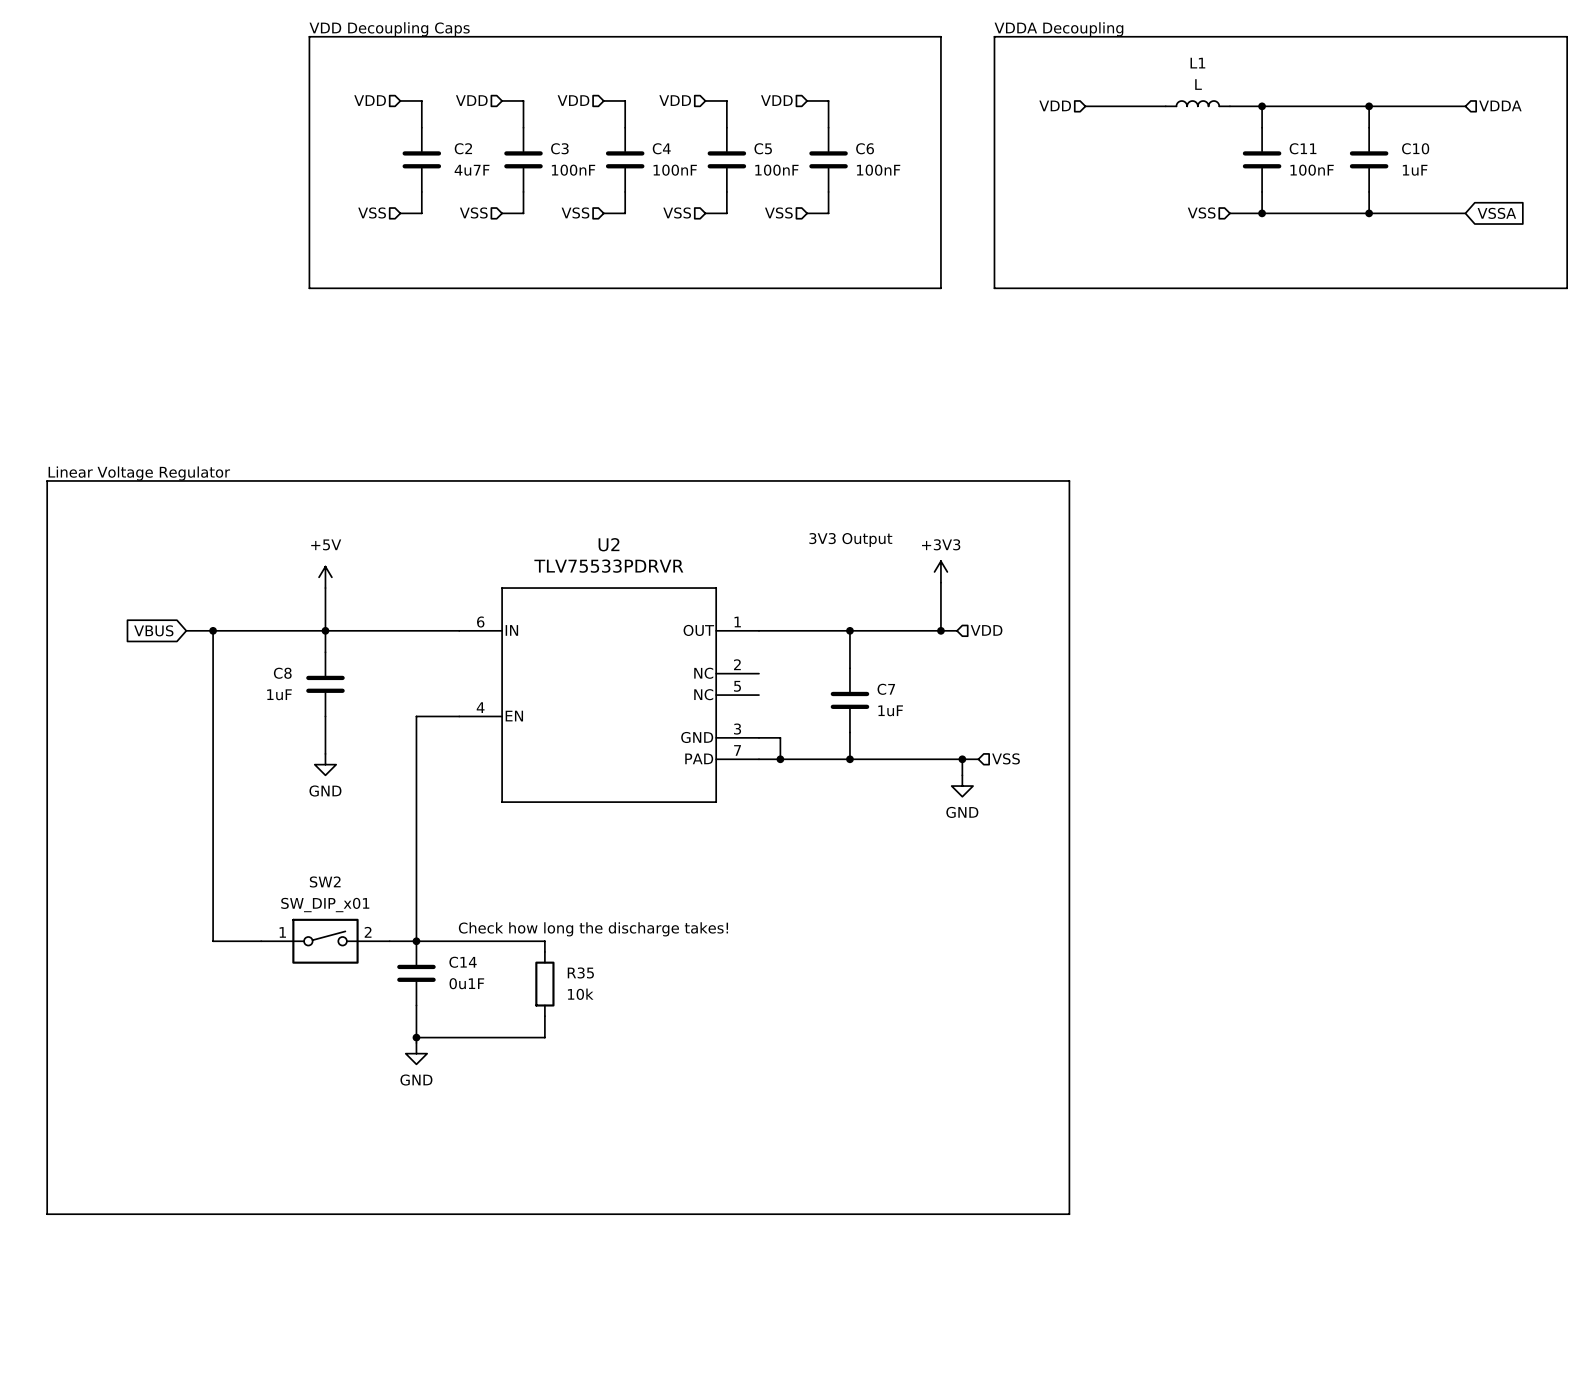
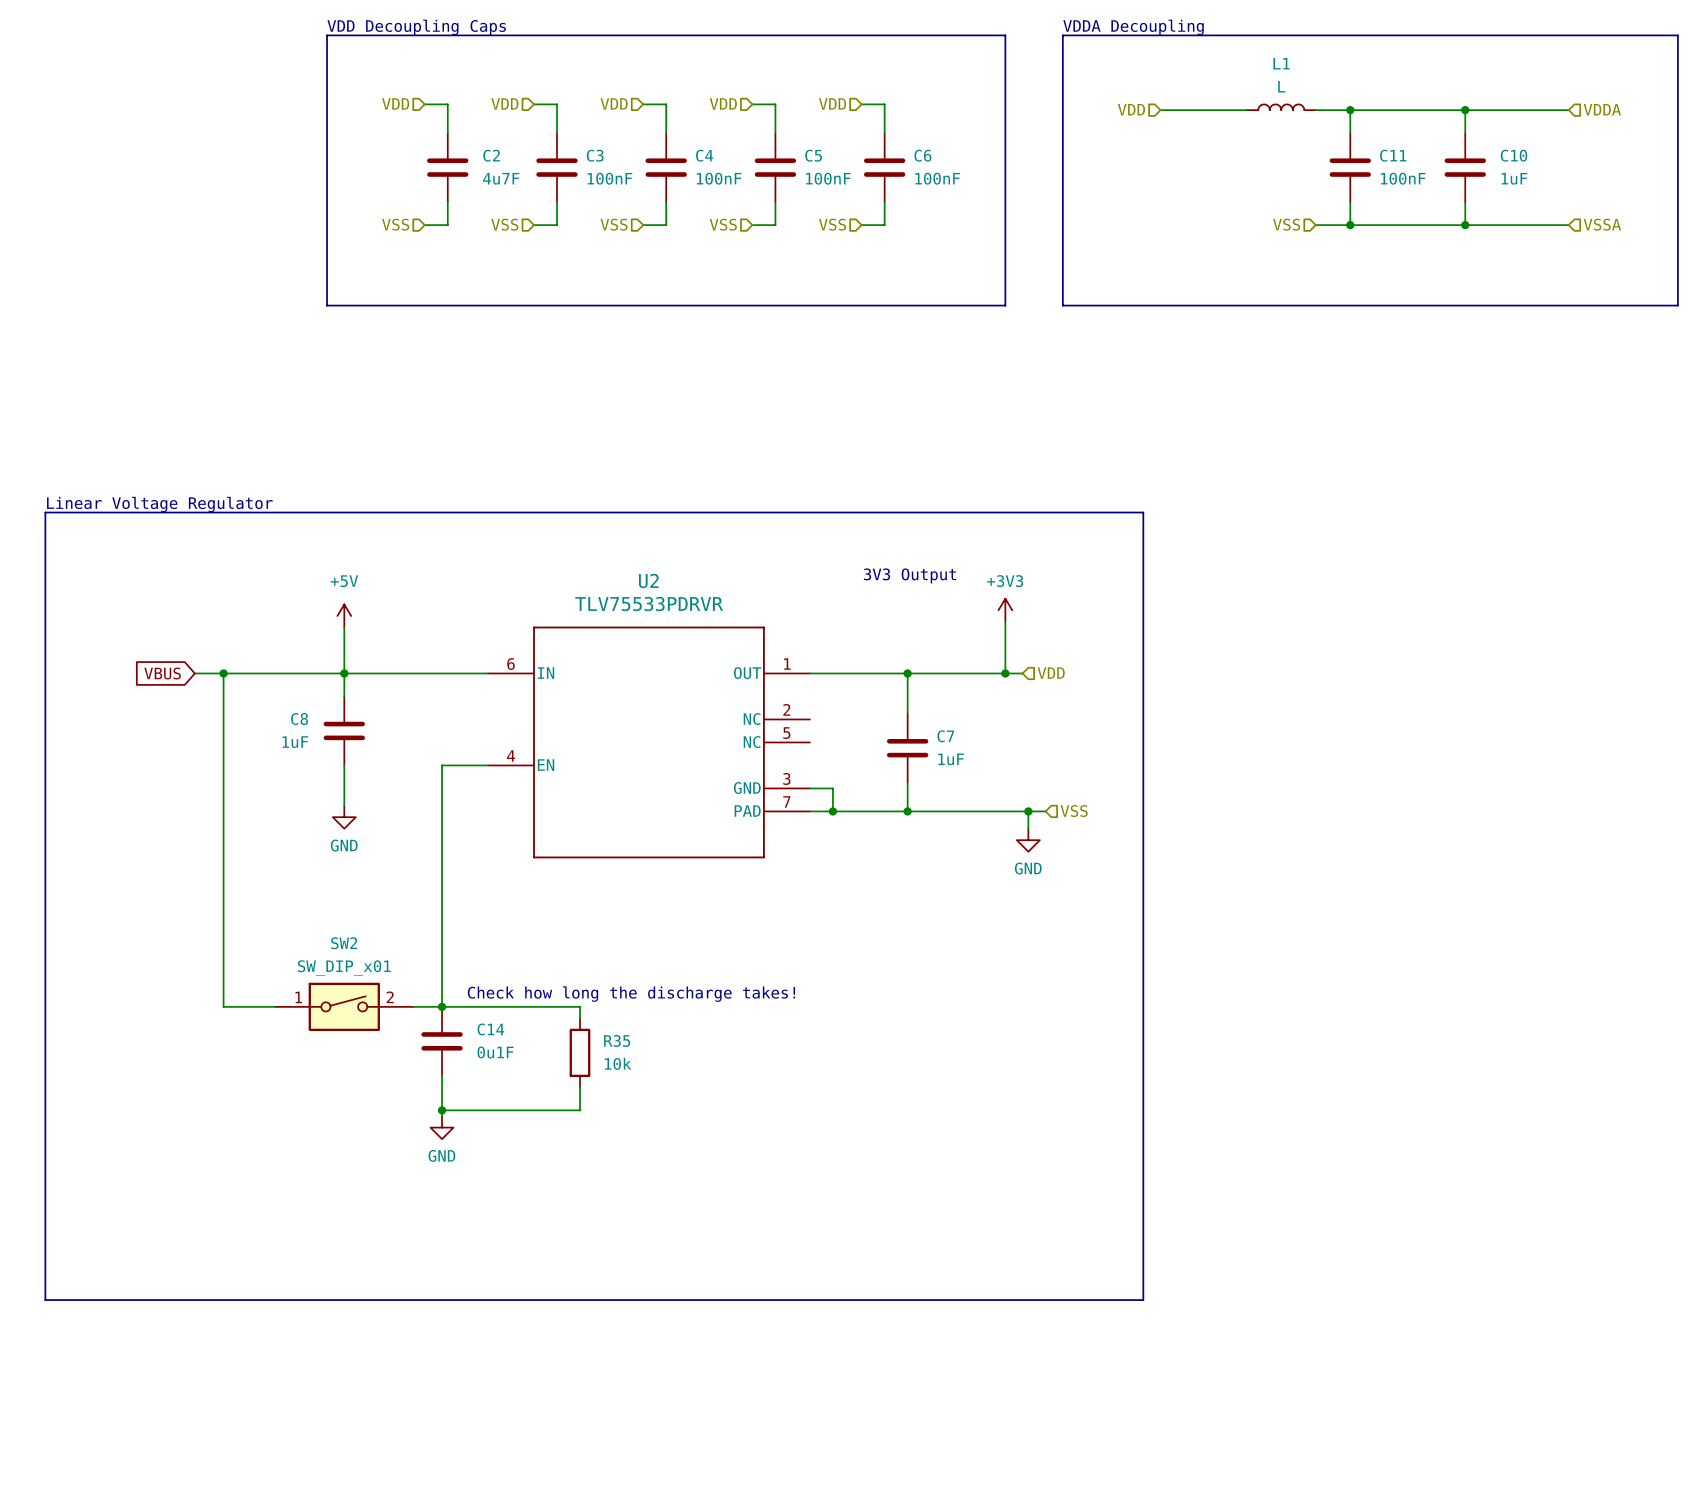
hierarchical label: none -> VSSA (1602, 224)
global label: VSSA (1496, 213) -> none

